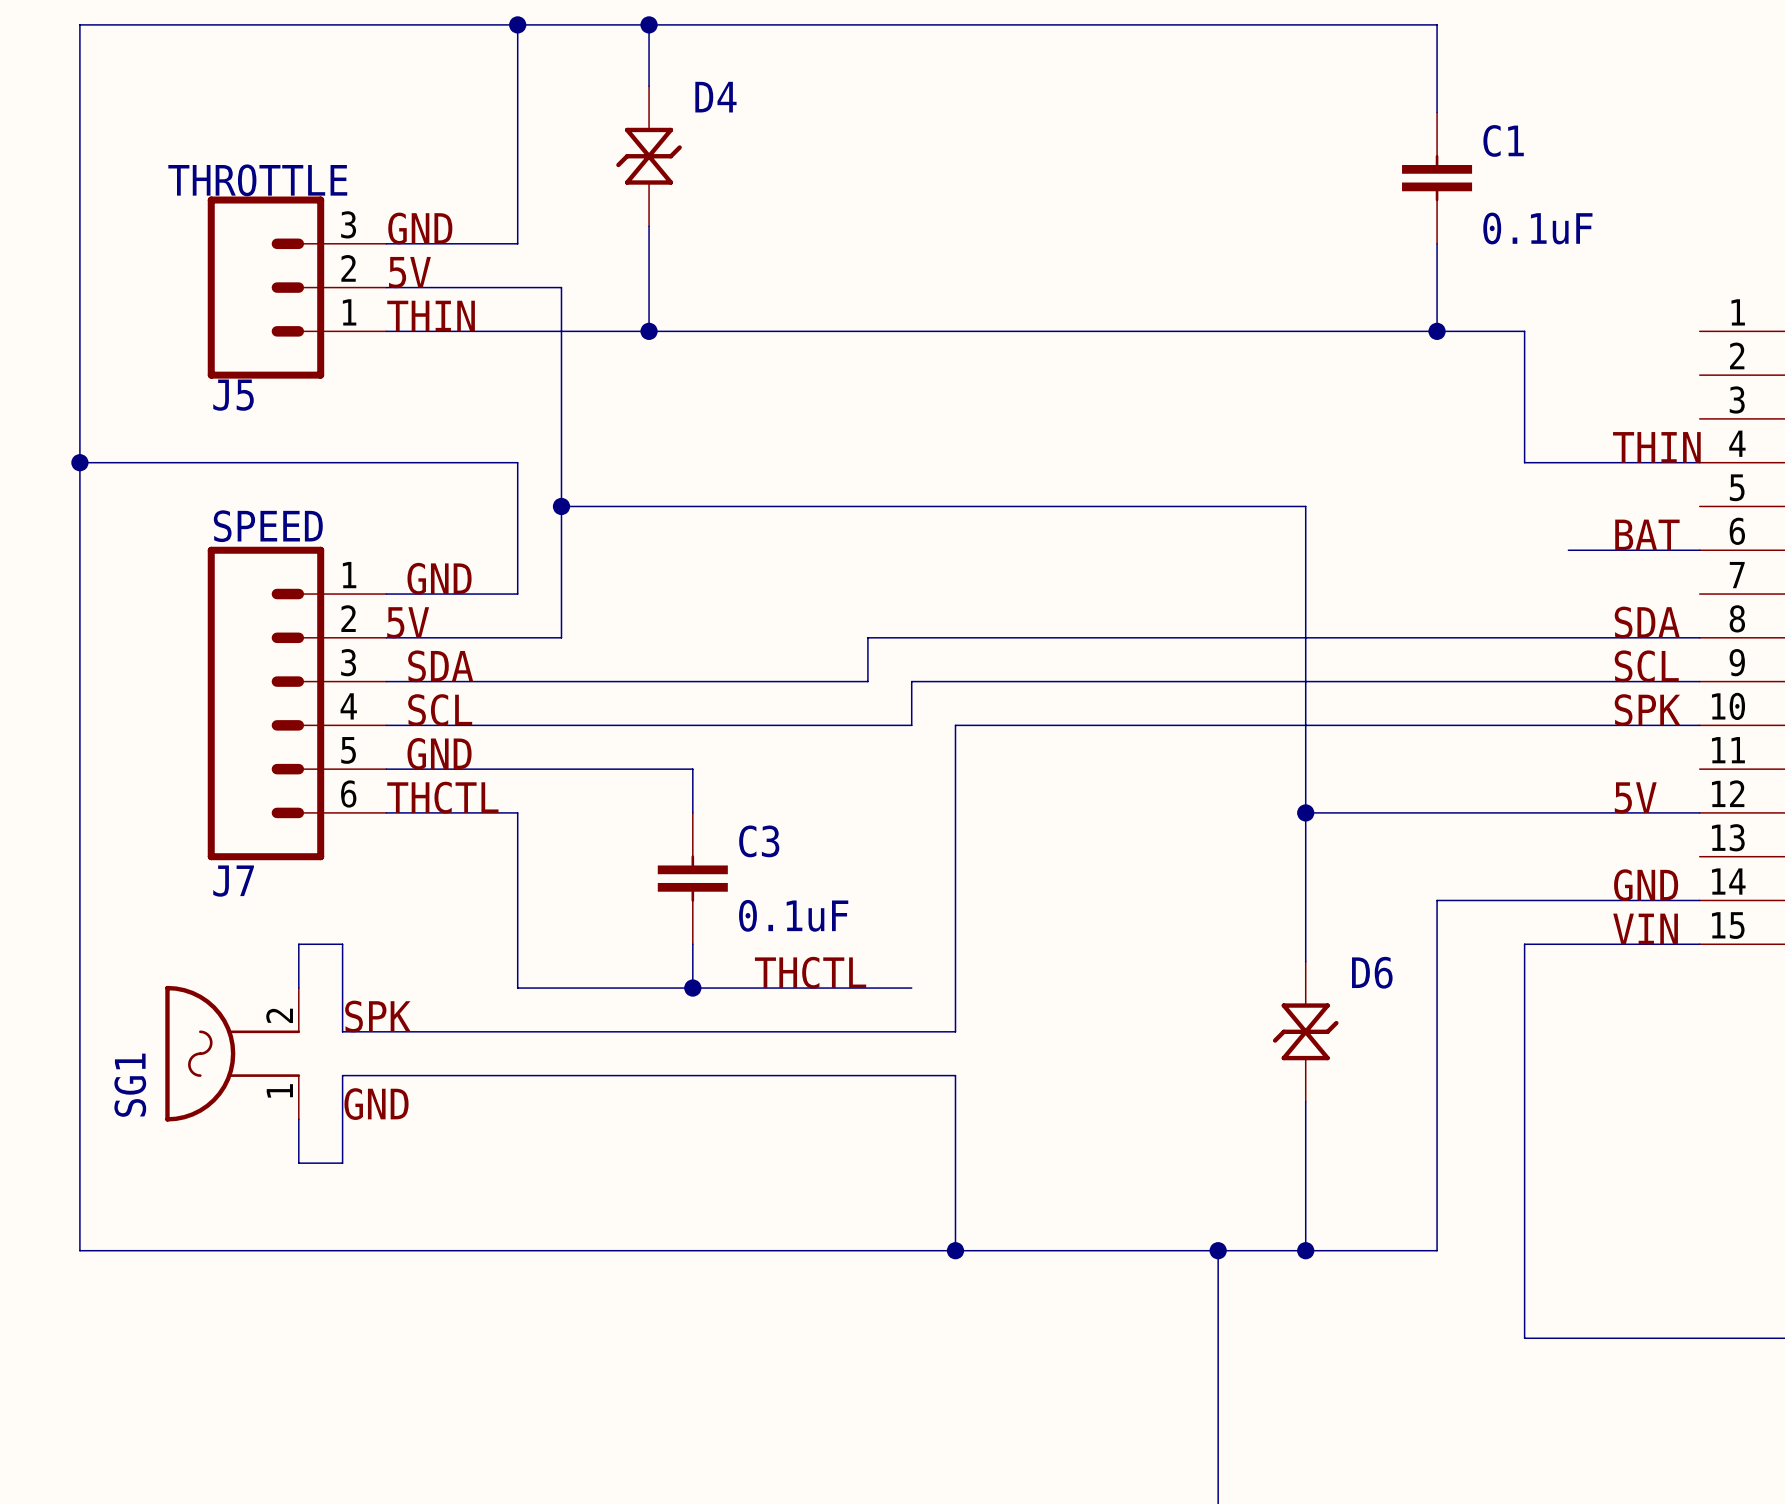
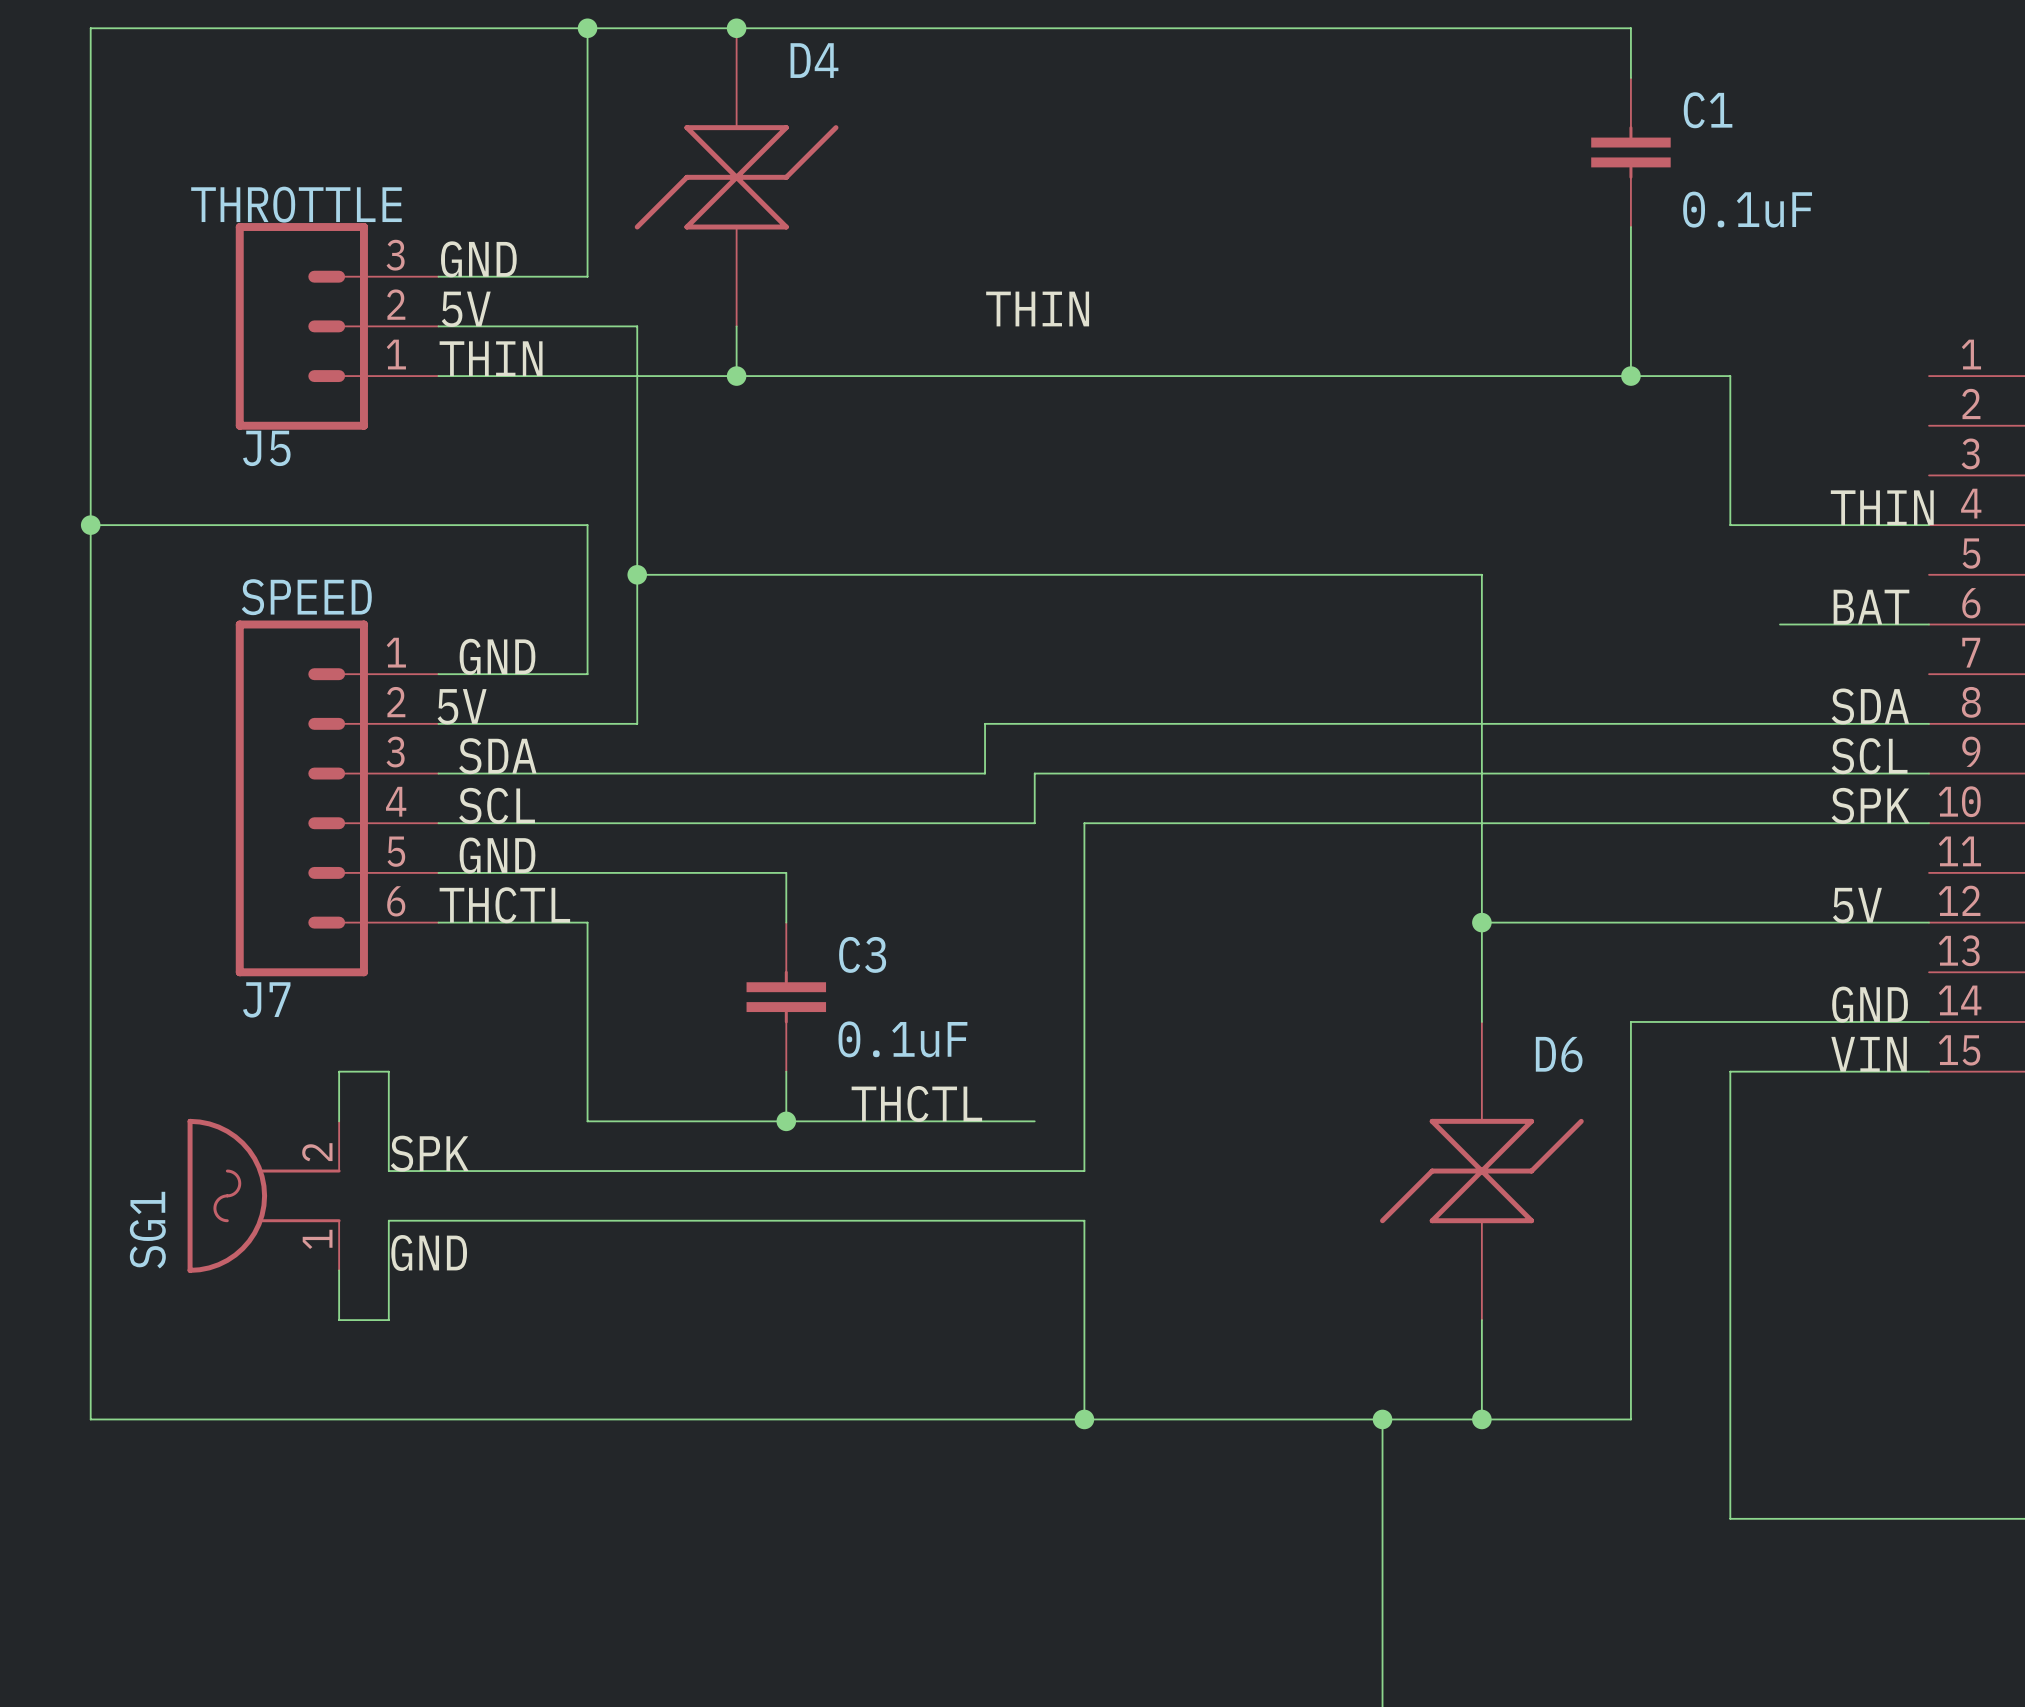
D4 symbol: [616, 86, 682, 227] -> [634, 28, 839, 327]
D4 name position: D4 (715, 97) -> D4 (814, 60)
C1 position: (1437, 178) -> (1630, 152)
label: none -> THIN (1037, 308)
D6 symbol: [1272, 961, 1339, 1102] -> [1380, 1021, 1584, 1321]
D6 name position: D6 (1372, 972) -> D6 (1559, 1054)

